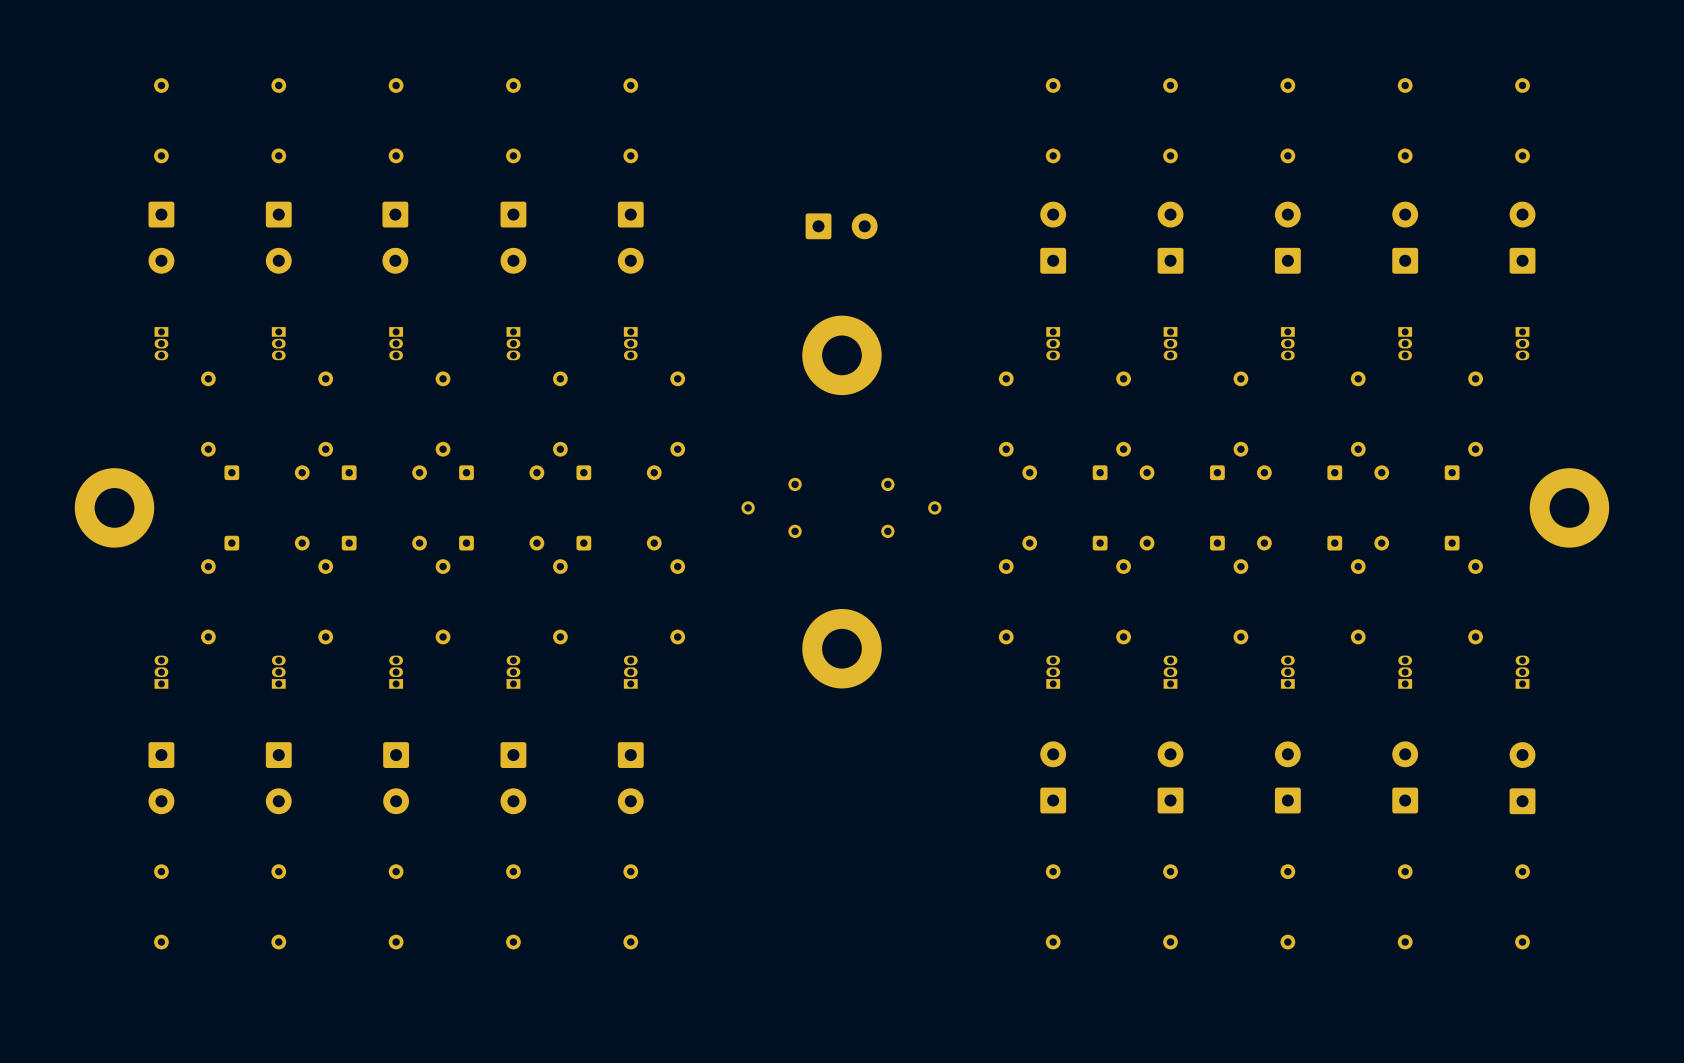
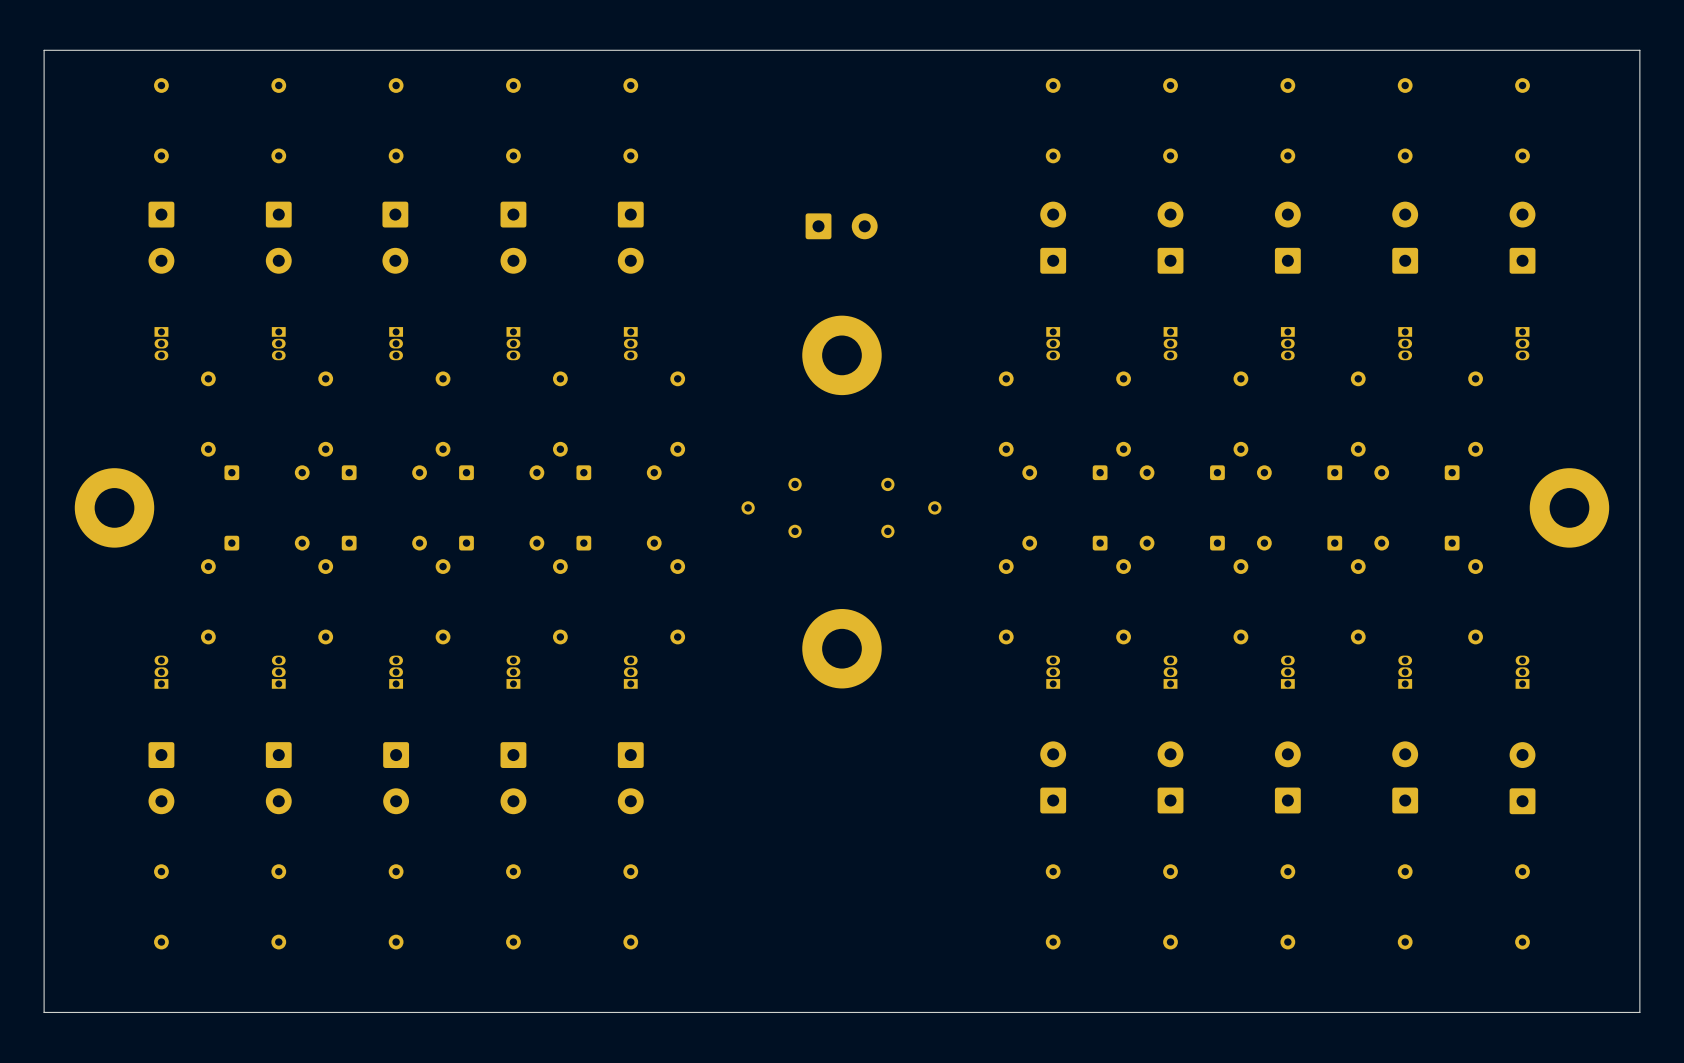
board edge: none -> (1639, 50) (44, 50) (44, 1012) (1639, 1012) (1639, 50)

